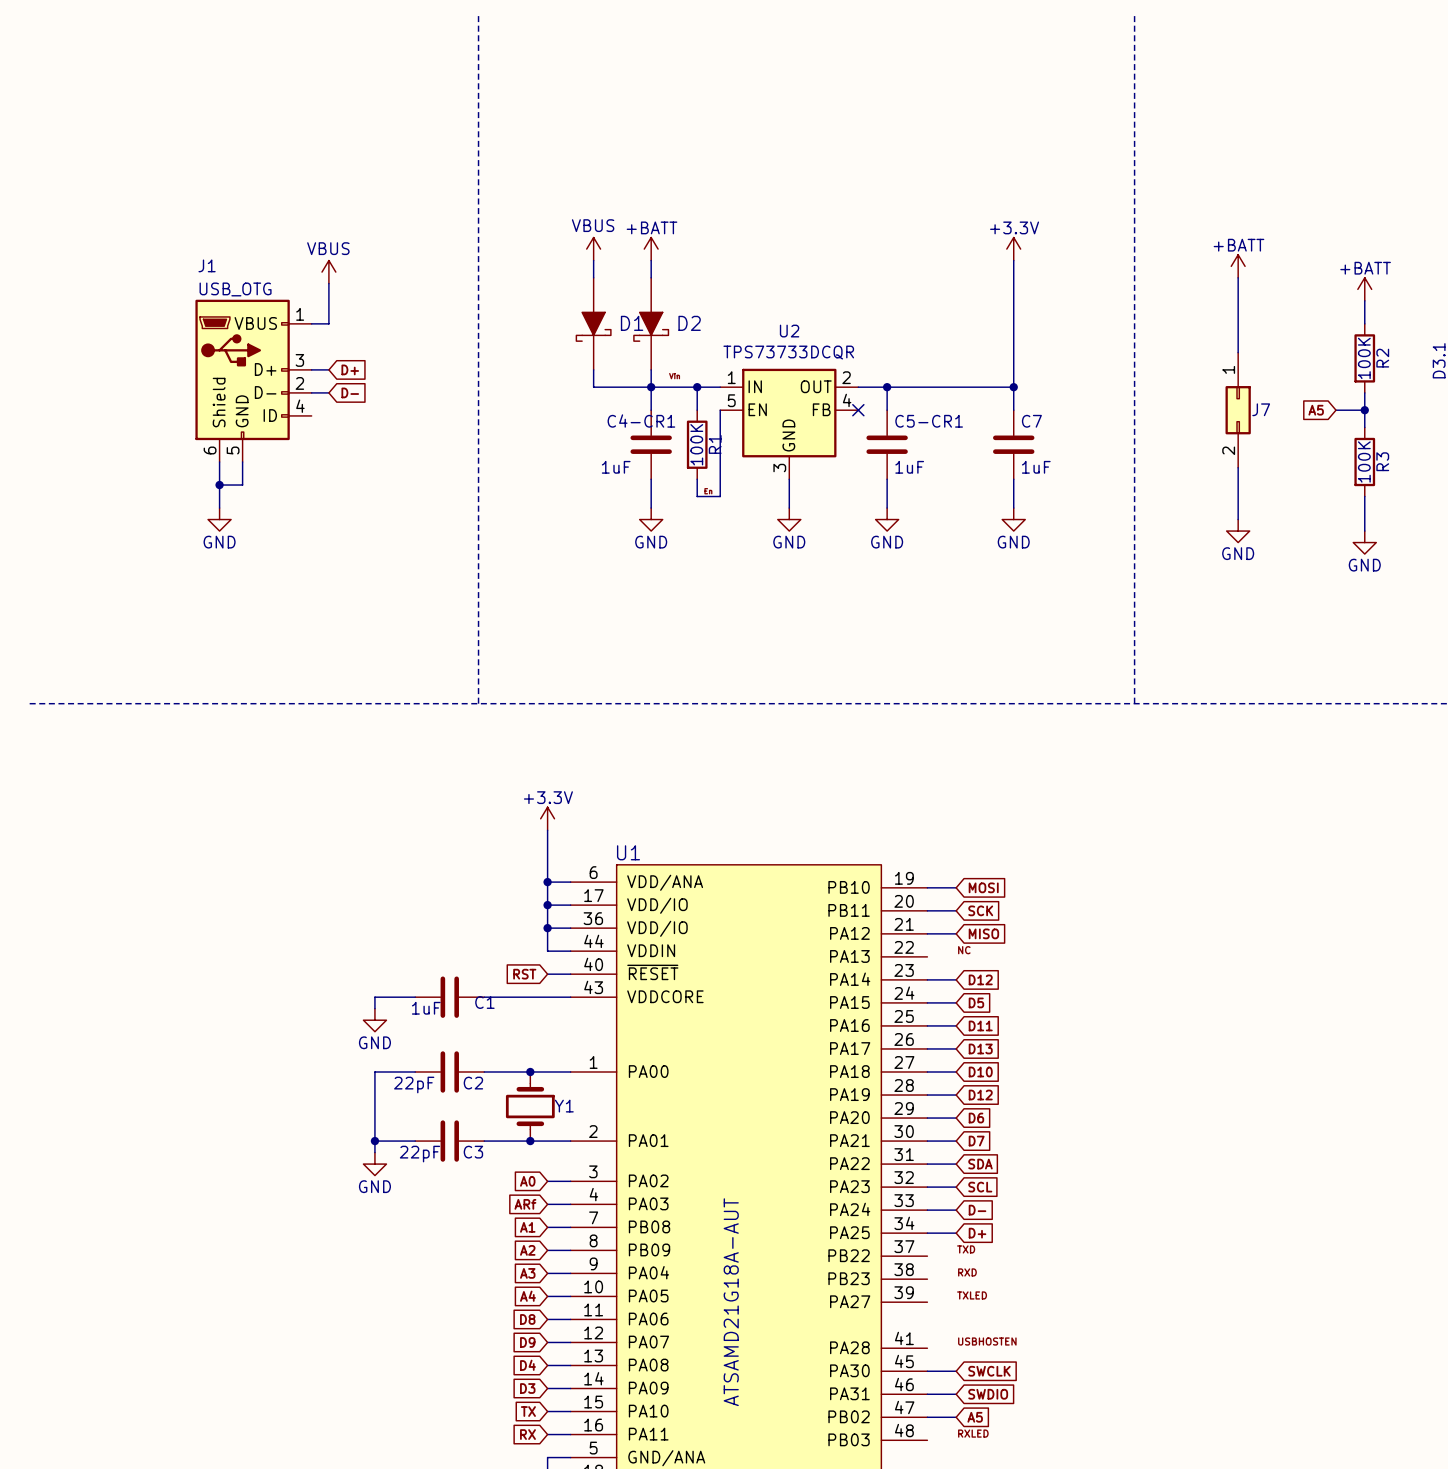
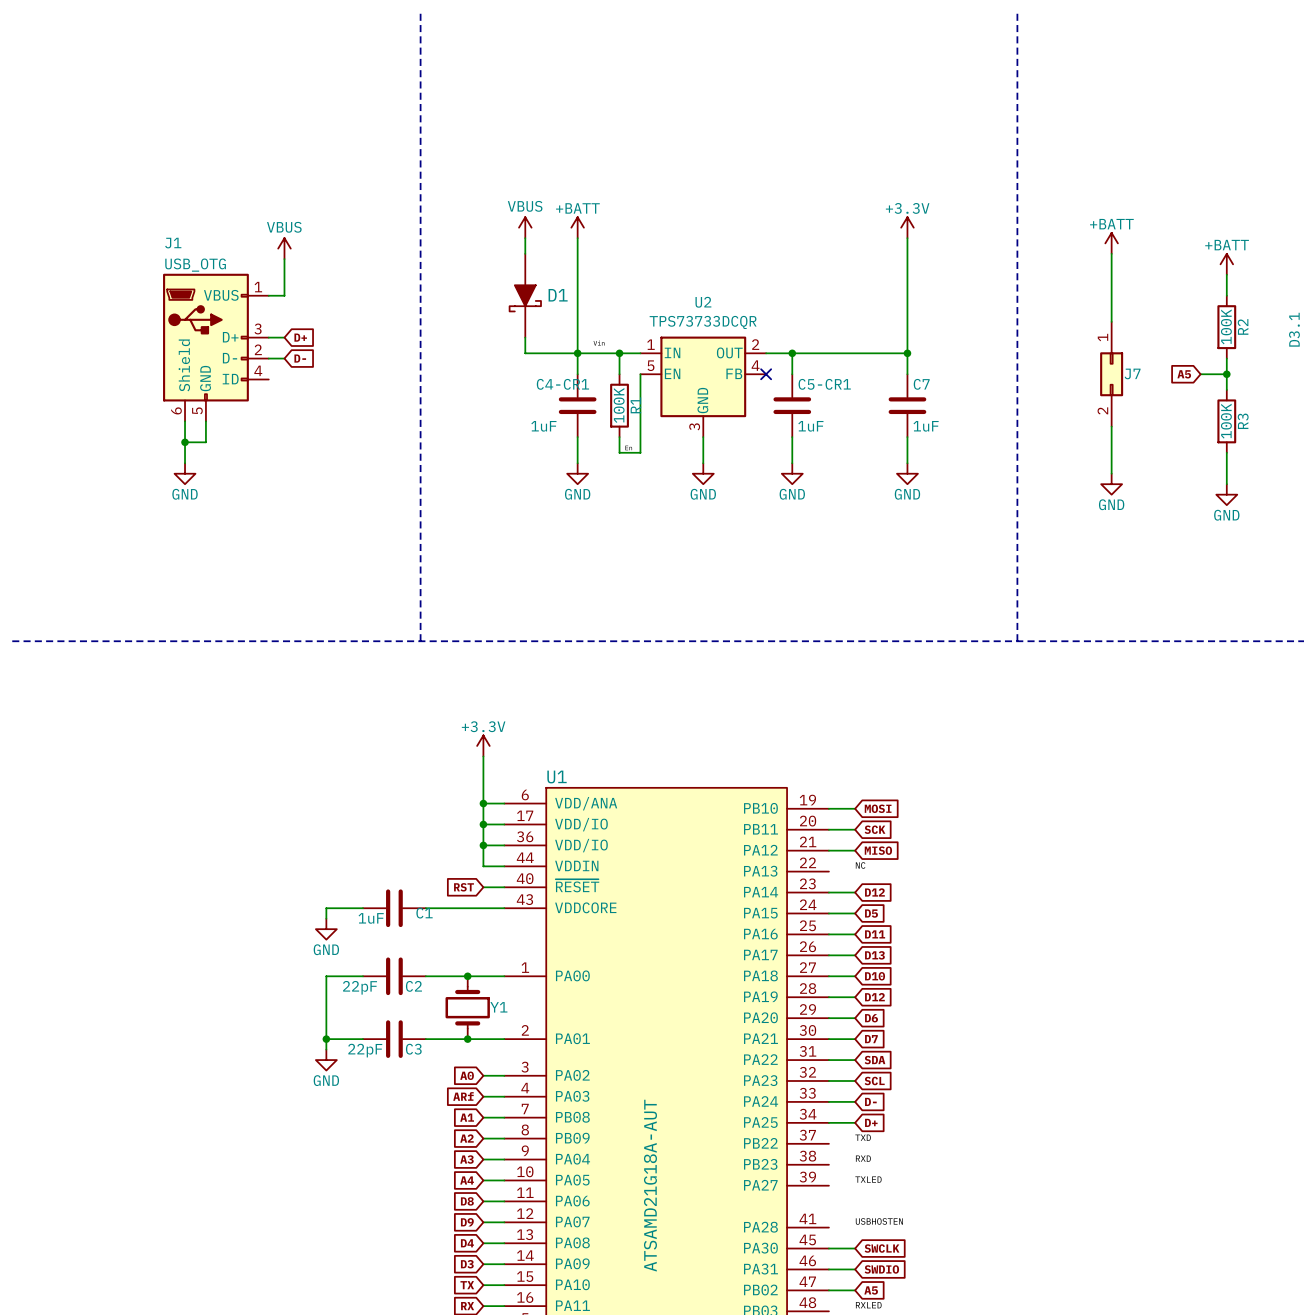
D2: (651, 323) -> none

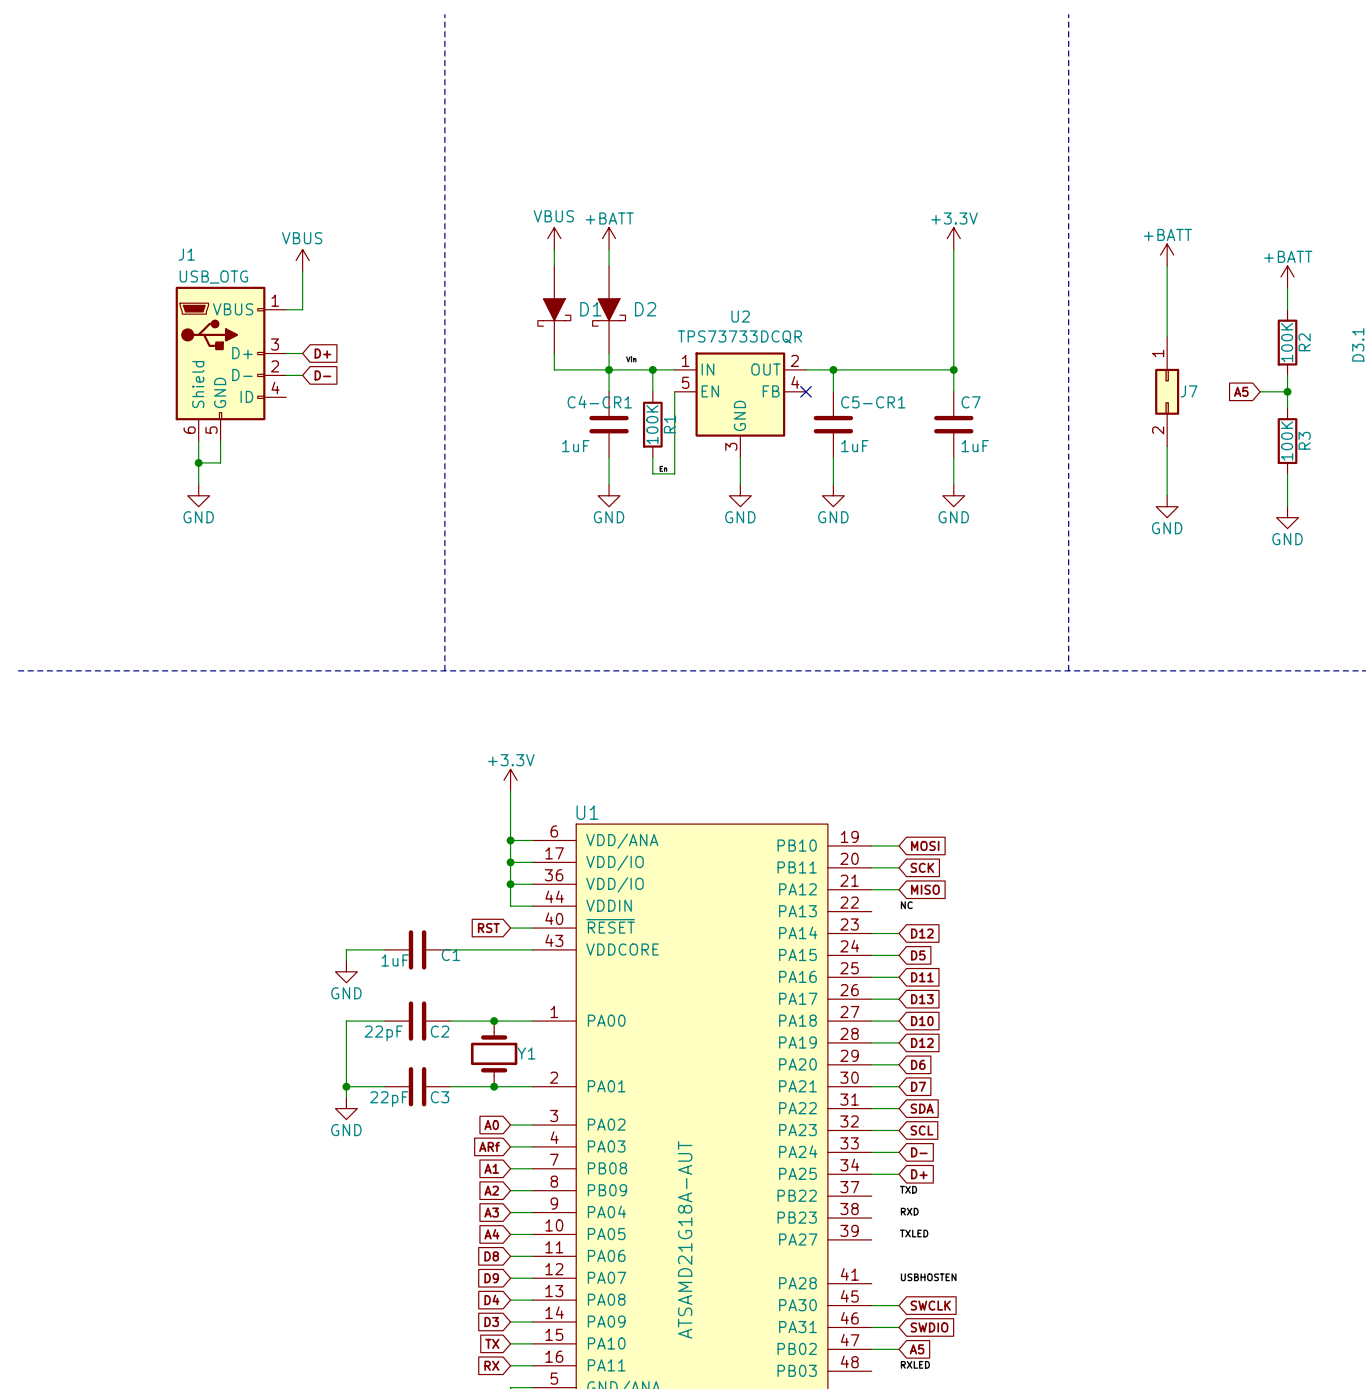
D2: none -> (609, 309)

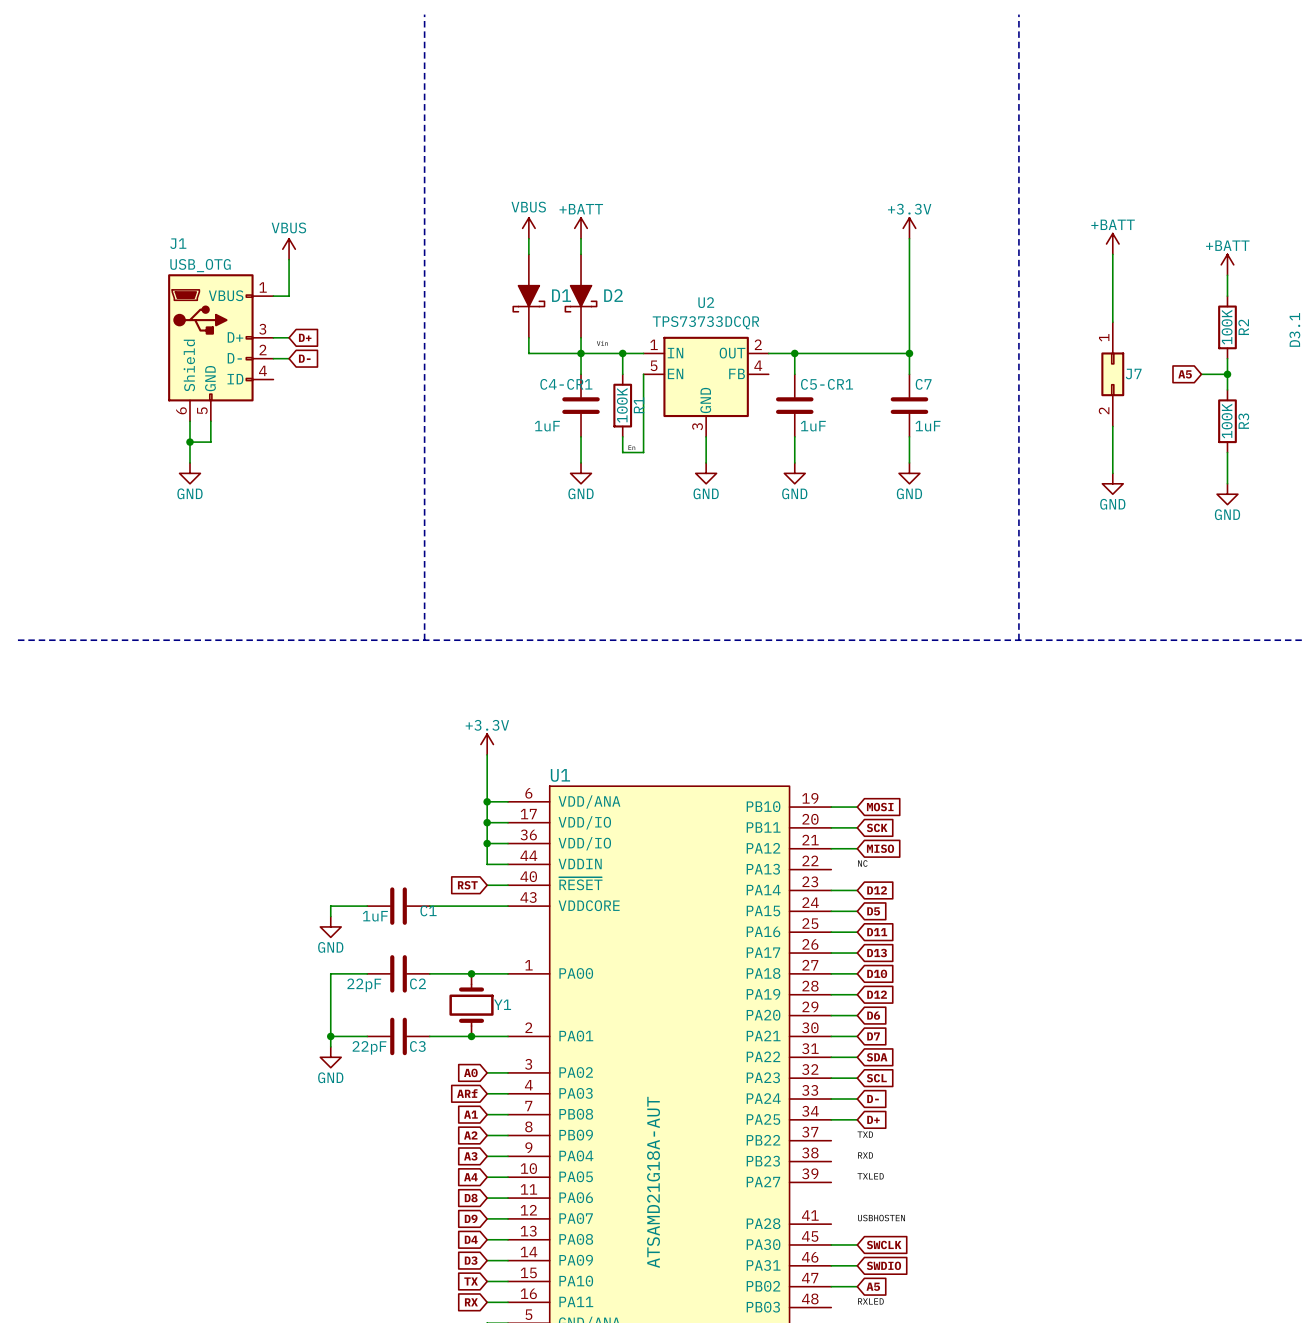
no-connect mark: (806, 391) -> none

